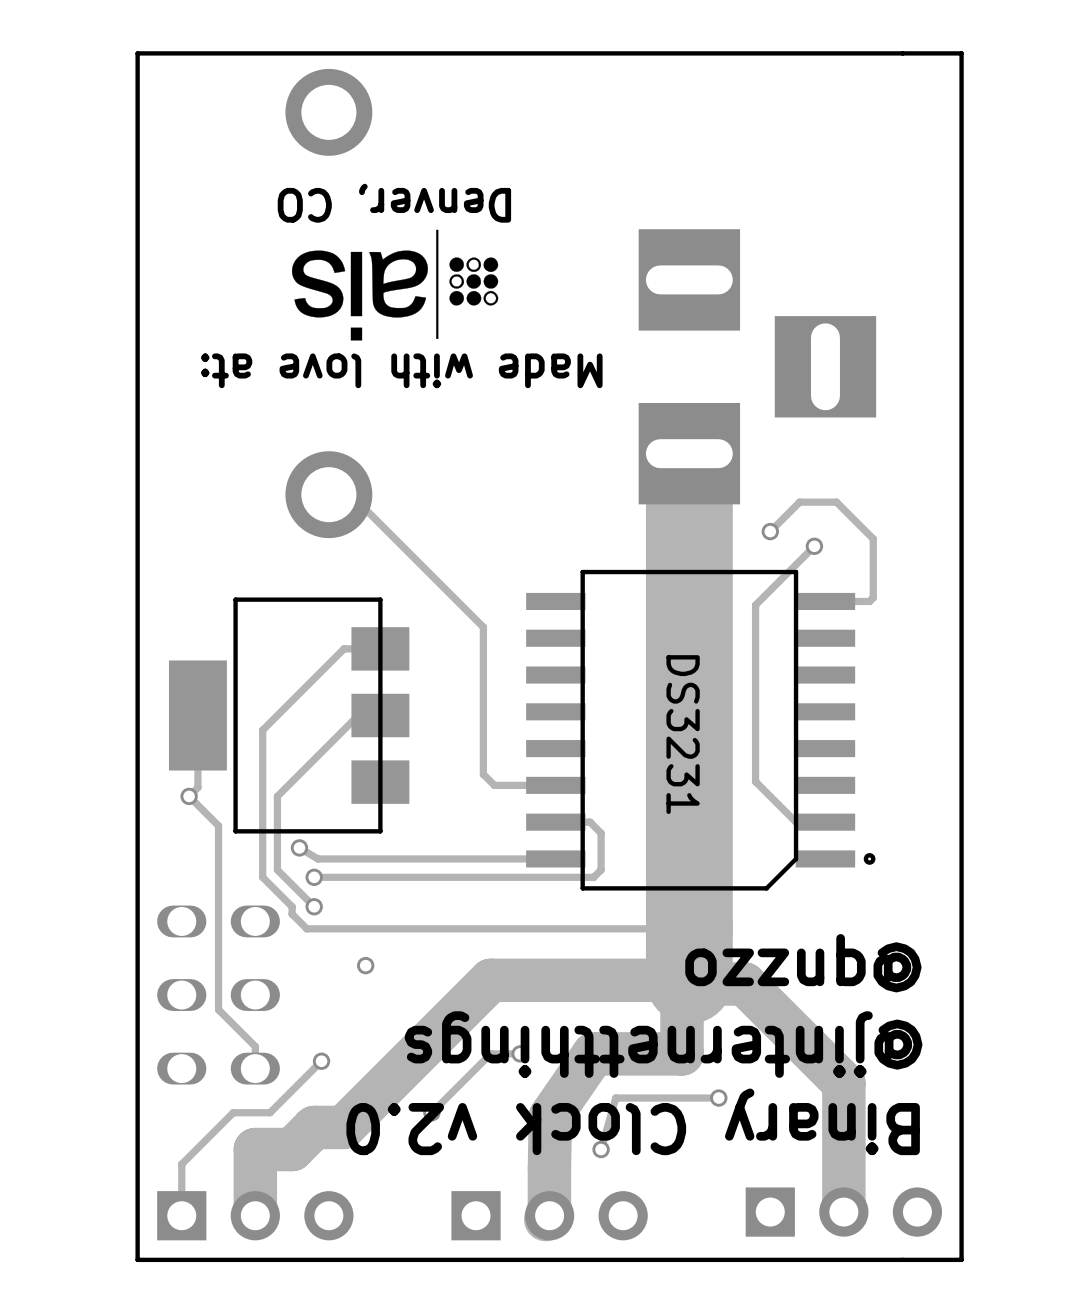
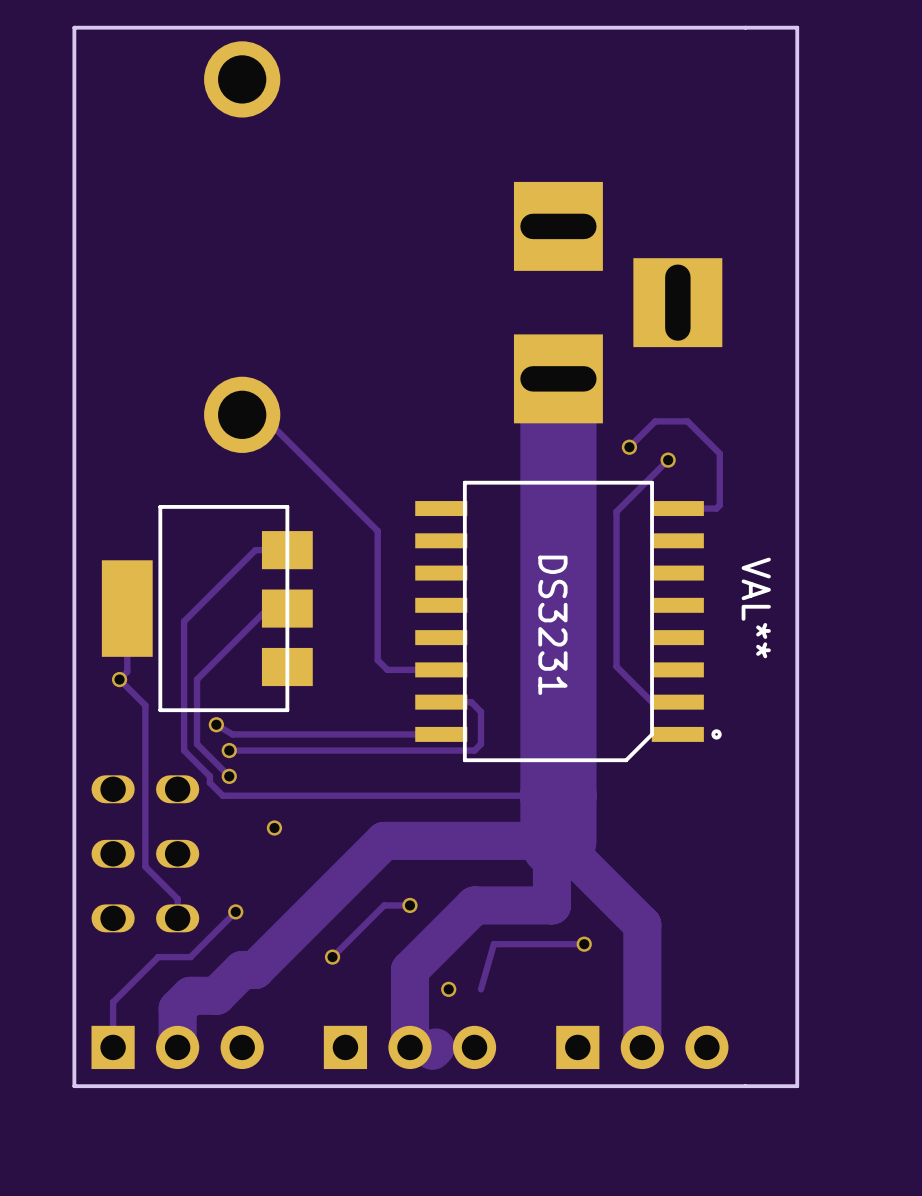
text: Denver, CO (394, 203) -> none
drawing: [291, 229, 499, 341] -> none
text: Made with love at: (401, 370) -> none
part text: none -> VAL** (756, 607)
text: @qnzzo (803, 963) -> none
track: none -> (558, 840) (642, 924) (642, 1047)
track: (682, 984) (744, 984) (843, 1083) (843, 1212) (845, 1210) -> none
text: @jinternetthings (663, 1044) -> none
track: (593, 1053) (550, 1116) (549, 1215) -> (474, 905) (409, 969) (409, 1047)
text: Binary Clock v2.0 (633, 1121) -> none
track: (328, 1127) (314, 1127) (292, 1149) (255, 1149) (255, 1171) -> (242, 969) (216, 995) (190, 995) (177, 1008)
via position: (601, 1149) -> (448, 989)
part position: (843, 1212) -> (642, 1047)
part position: (549, 1215) -> (409, 1047)

